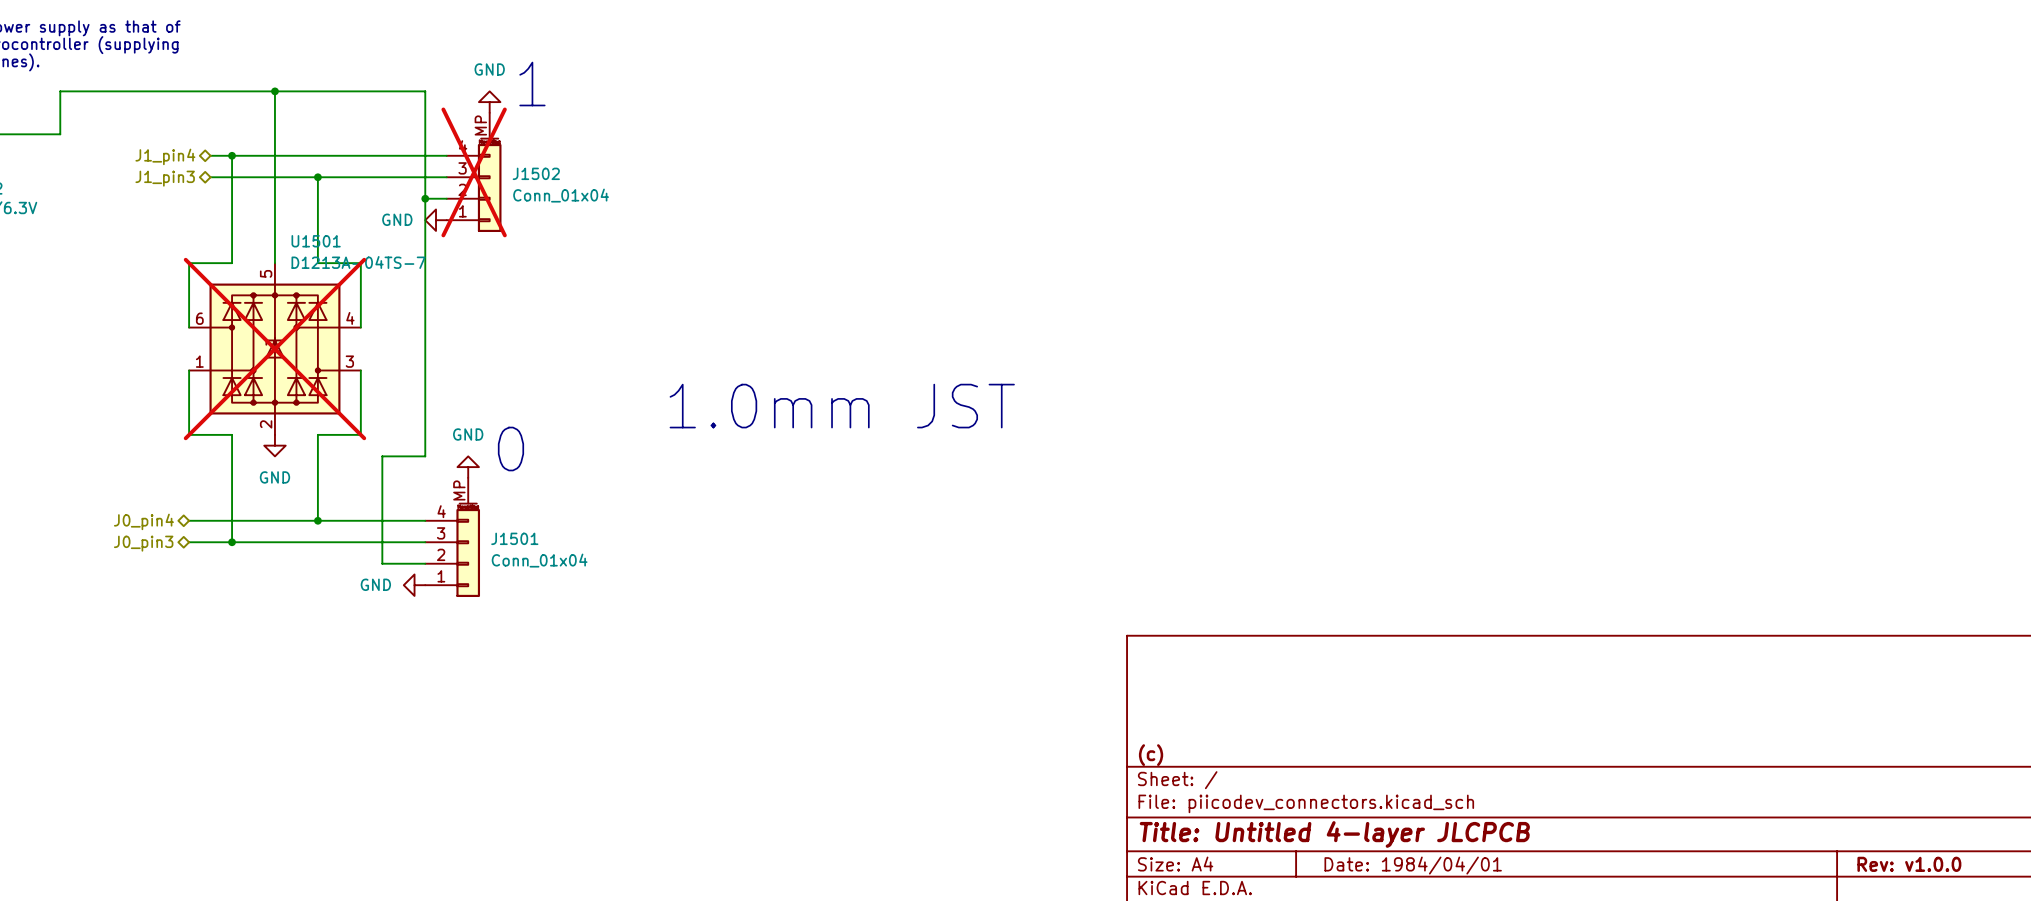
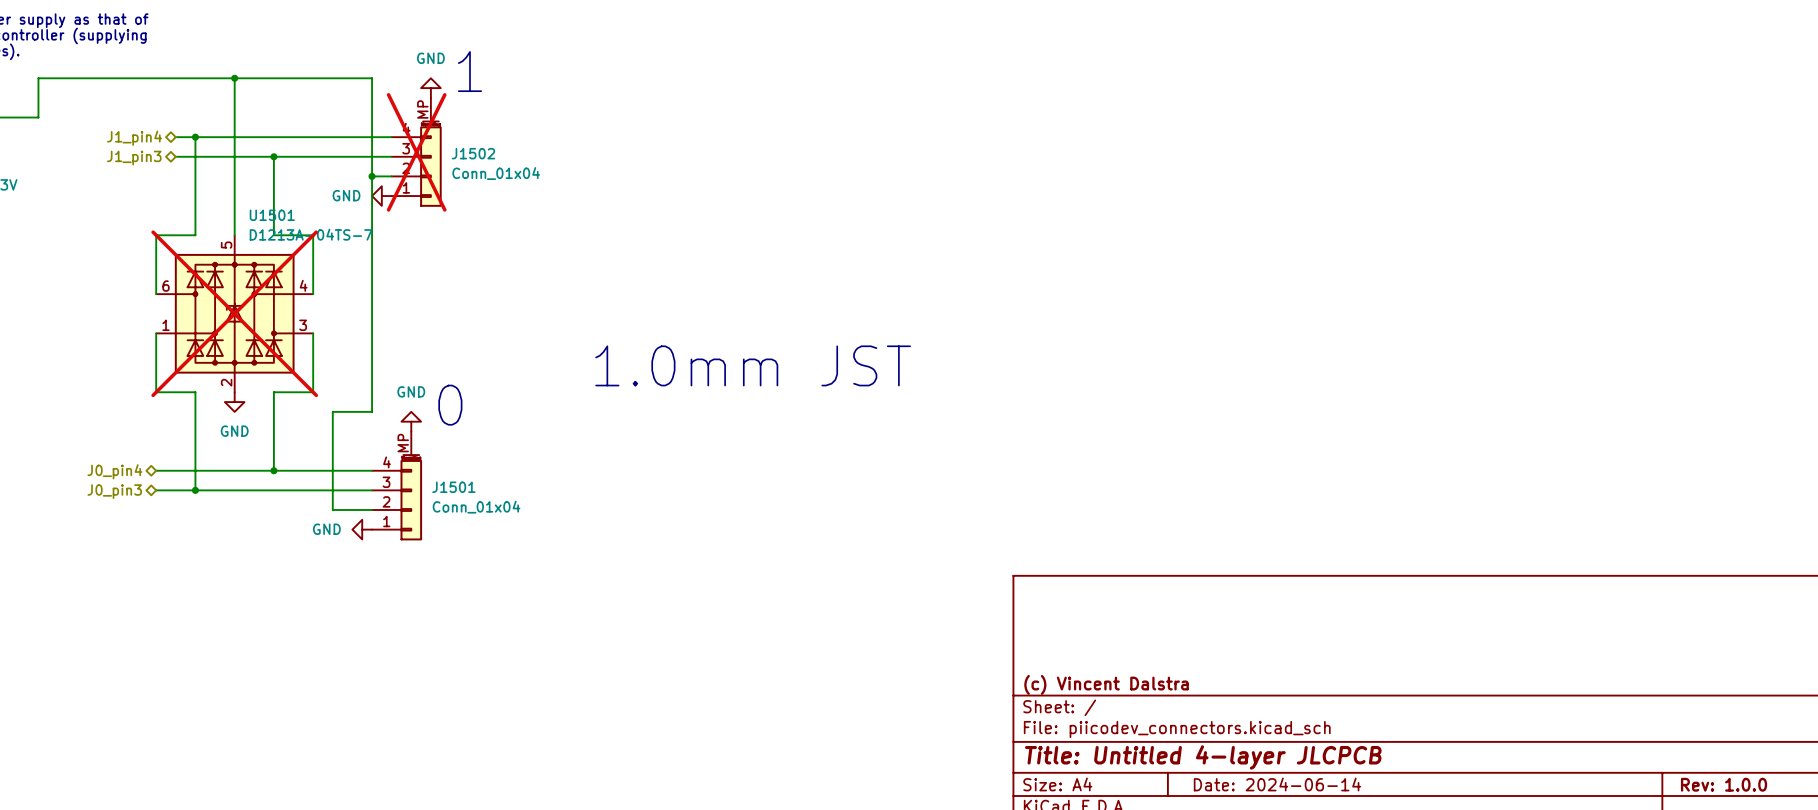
title block: (c) (1151, 755) -> (c) Vincent Dalstra (1106, 684)
title block: Rev: v1.0.0 (1909, 864) -> Rev: 1.0.0 (1724, 784)
title block: Date: 1984/04/01 (1413, 865) -> Date: 2024-06-14 (1277, 784)

